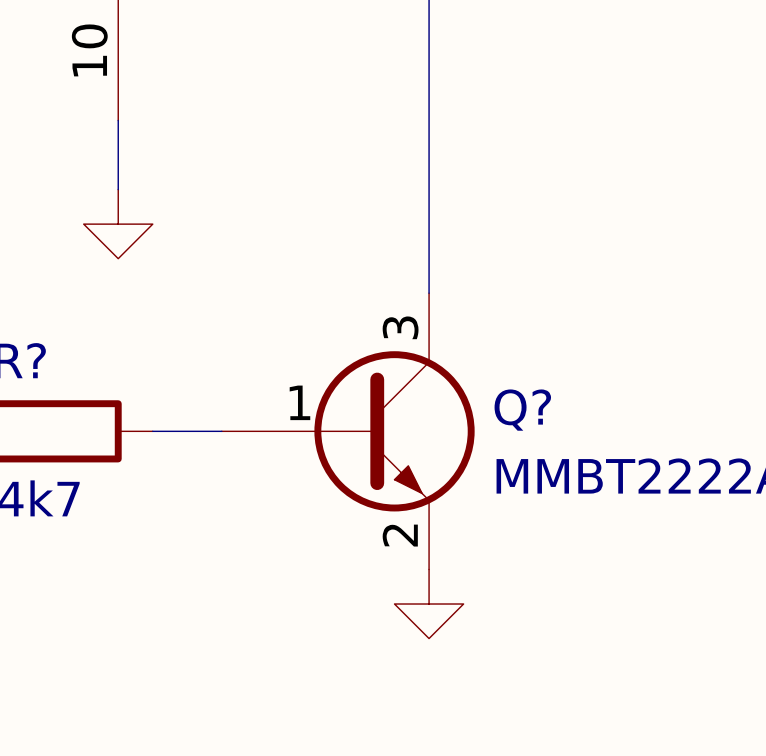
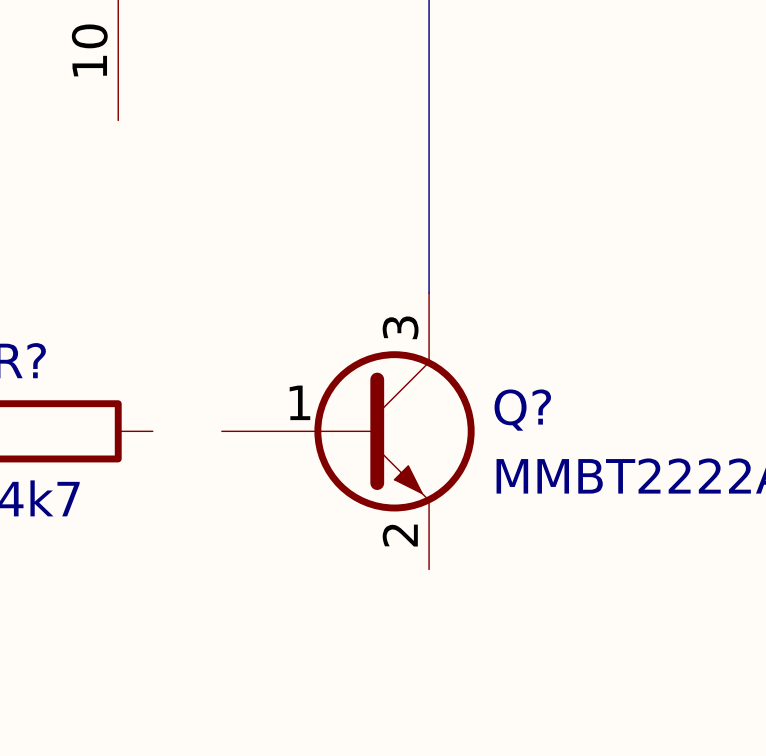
wire: (118, 120) (118, 189) -> none
power symbol: (118, 224) -> none
wire: (152, 431) (221, 431) -> none
power symbol: (429, 604) -> none

